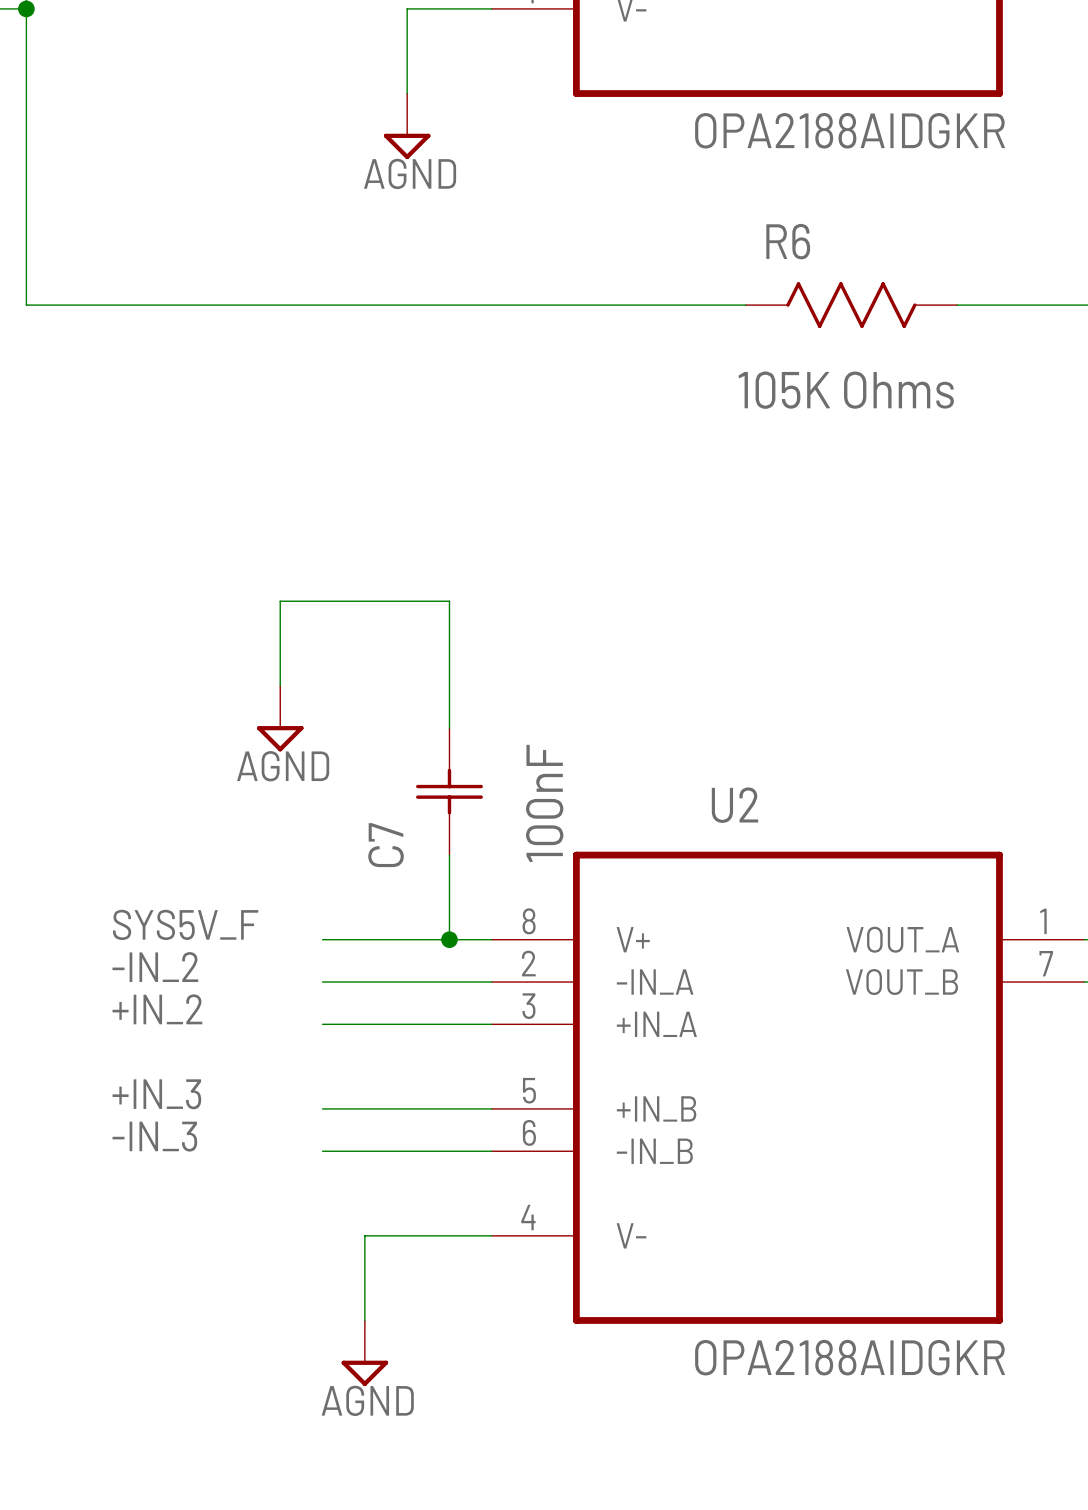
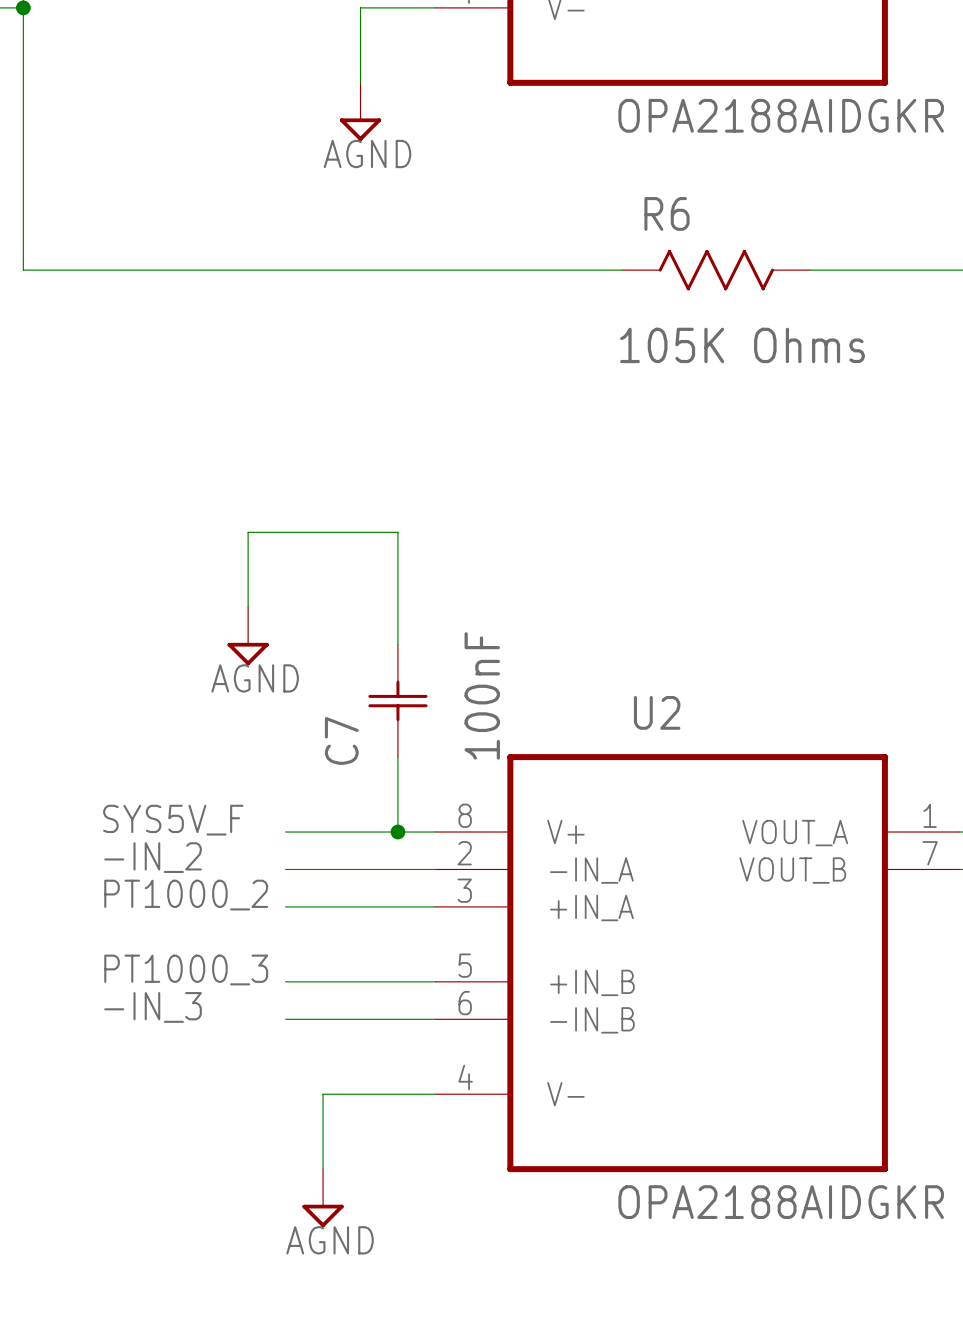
R6 position: (851, 305) -> (716, 270)
label: +IN_2 (157, 1009) -> PT1000_2 (186, 895)
label: +IN_3 (156, 1094) -> PT1000_3 (186, 969)

